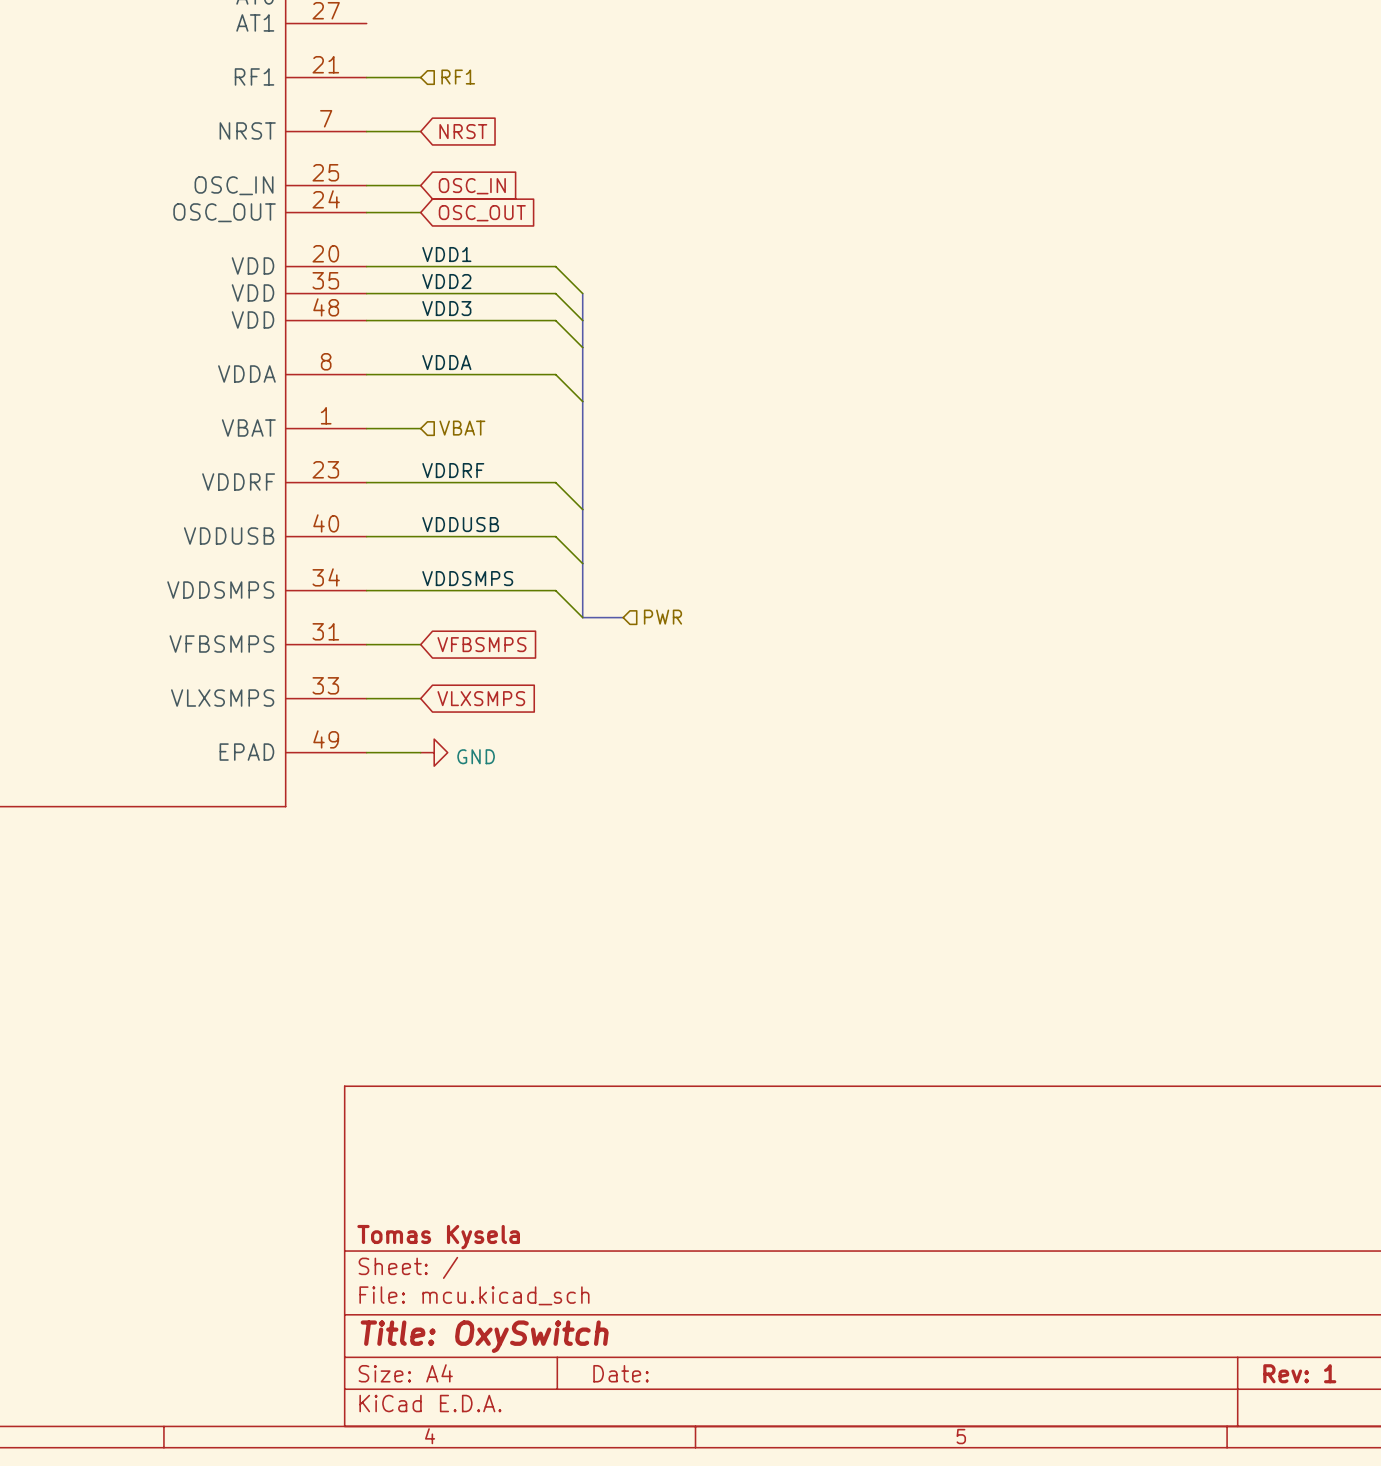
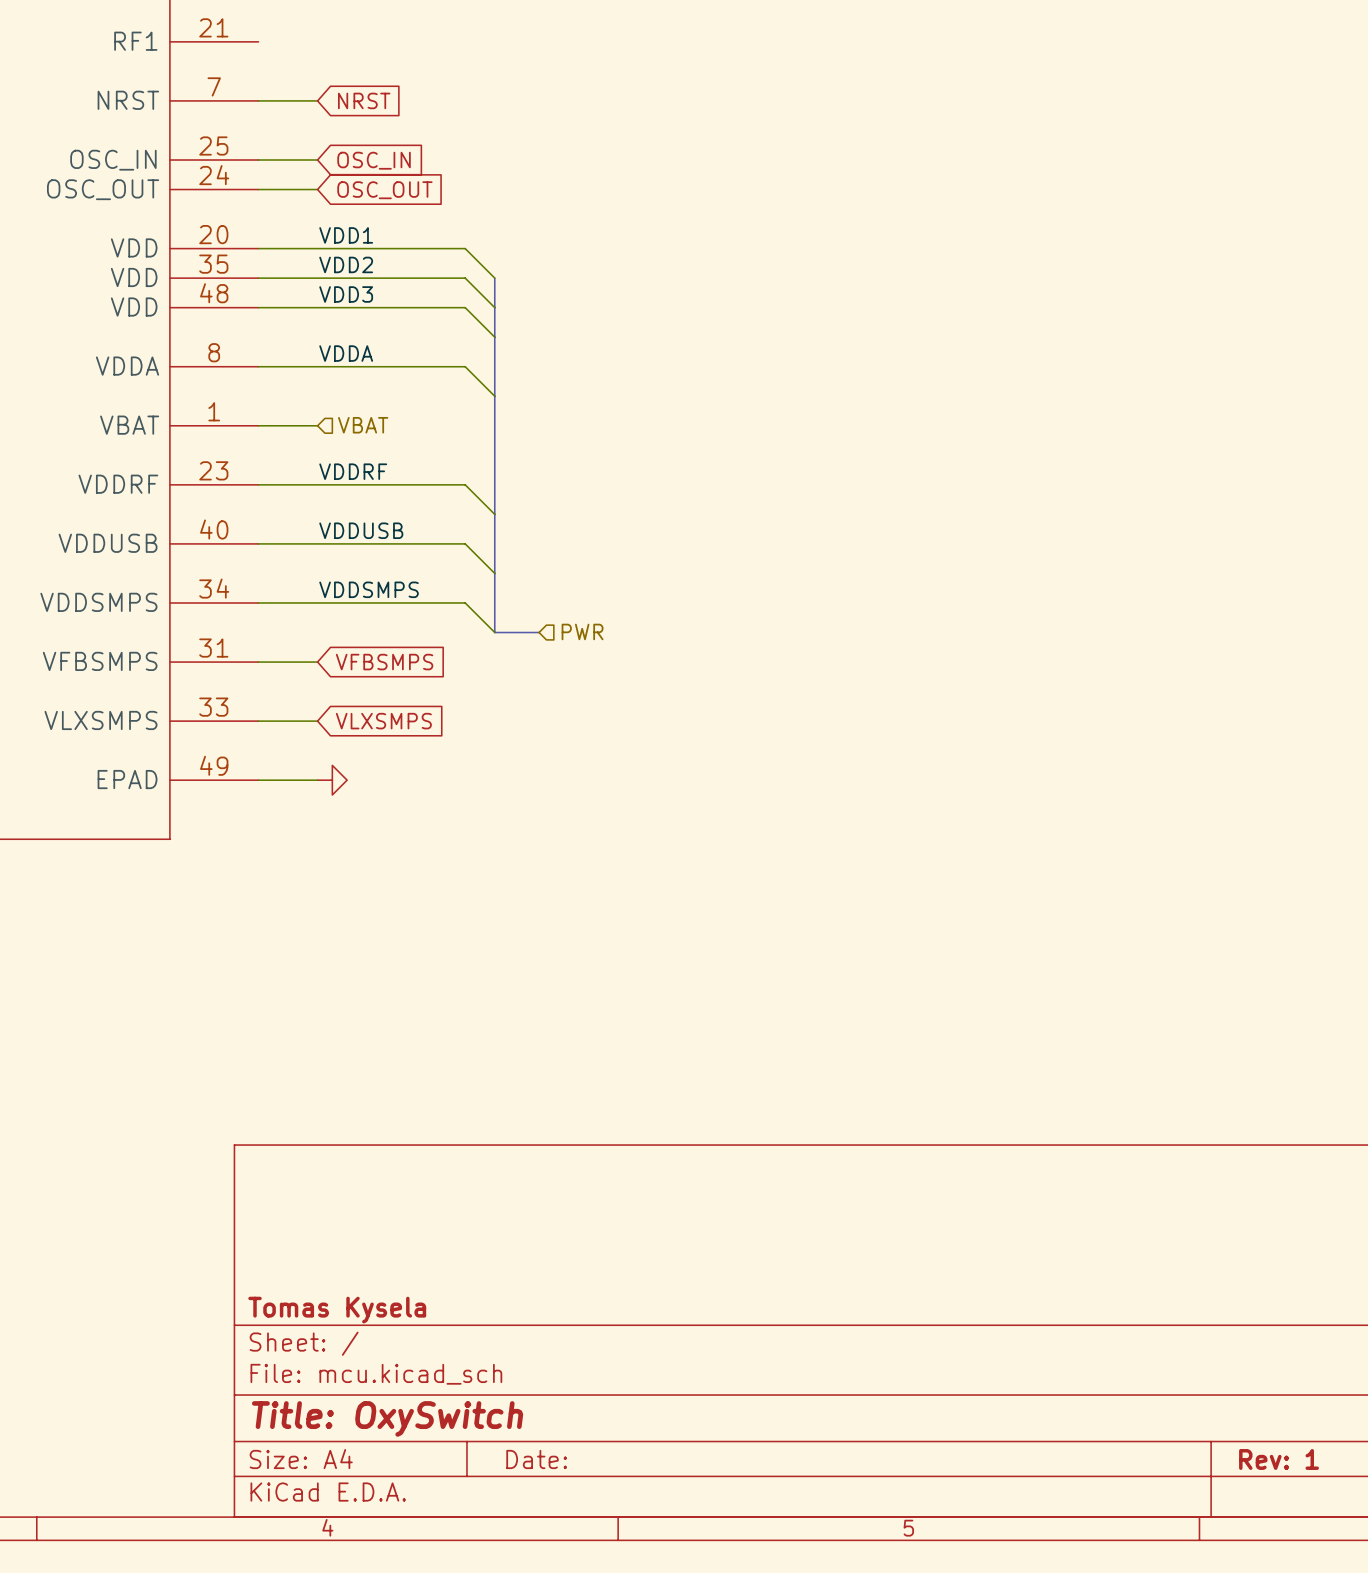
wire: (366, 77) (420, 77) -> none
hierarchical label: RF1 (458, 77) -> none
power symbol text: GND (476, 756) -> none

